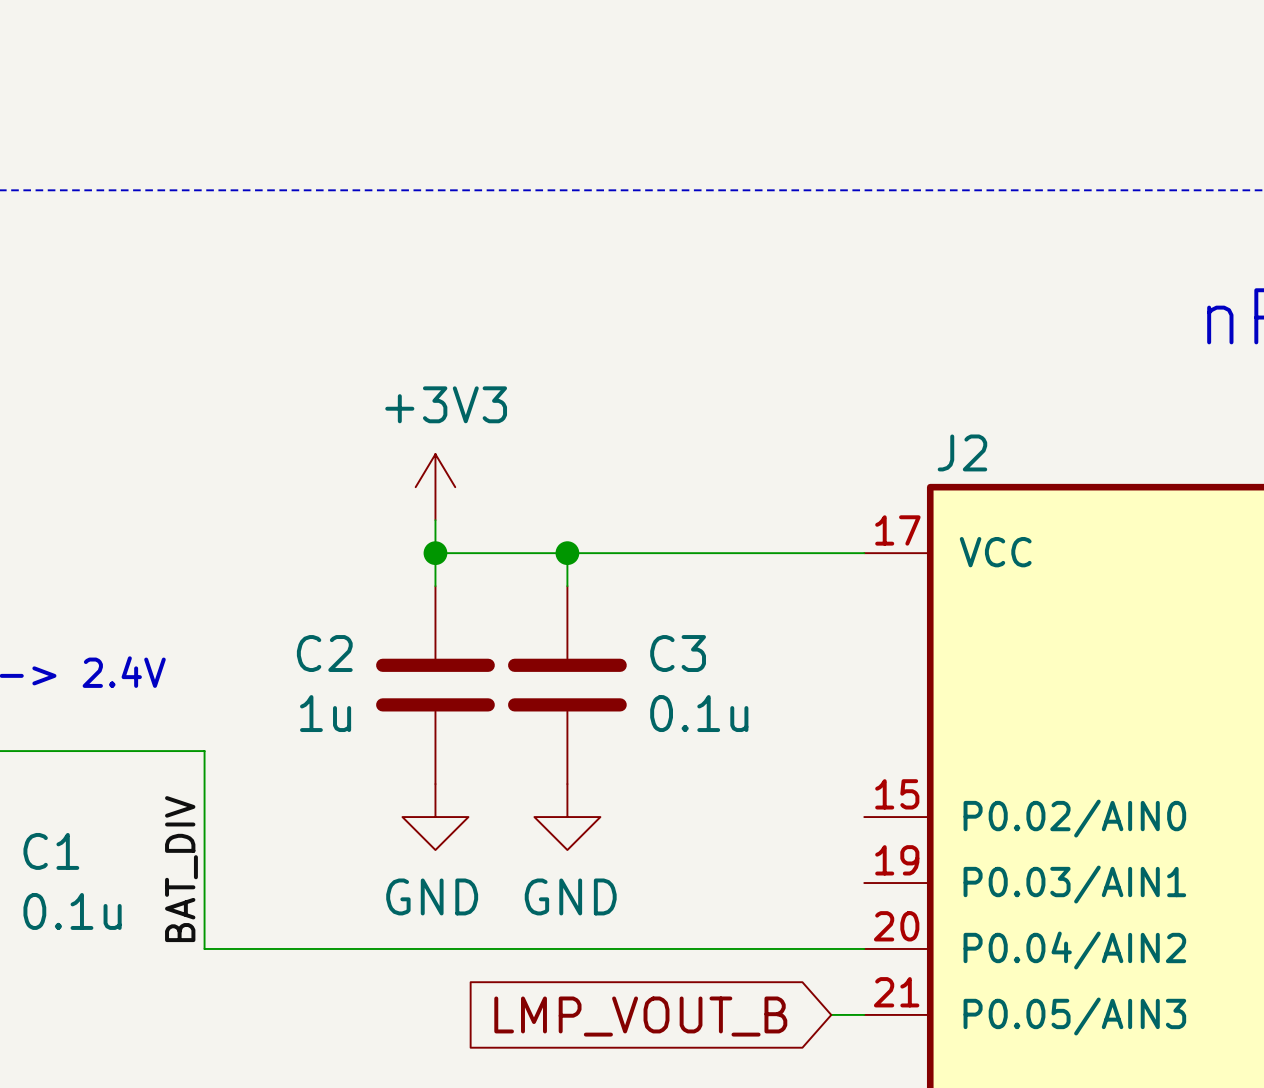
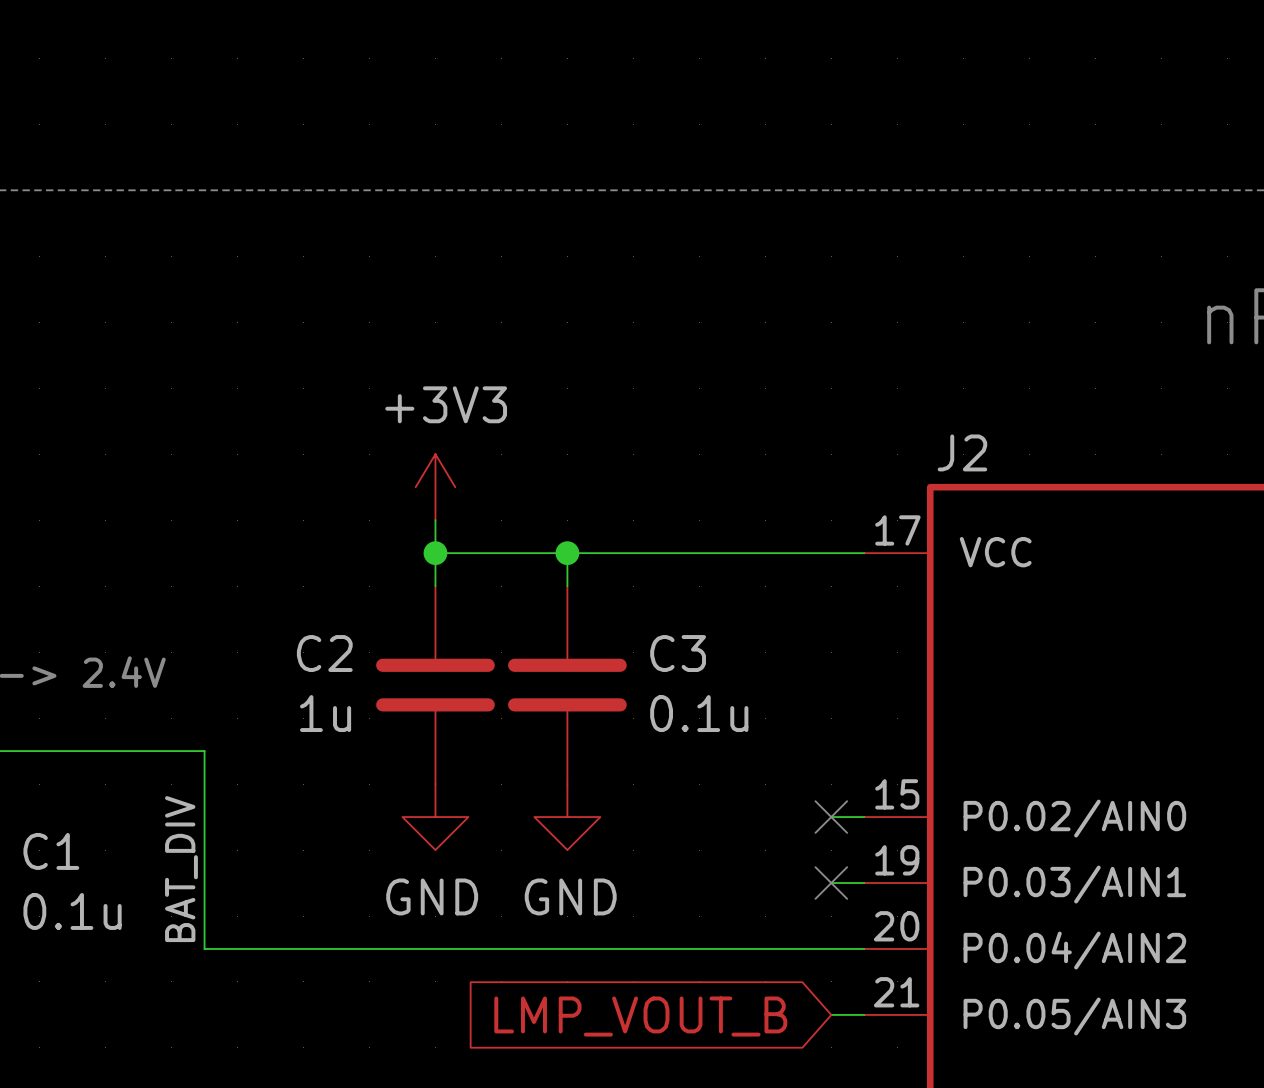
wire: none -> (831, 817) (864, 817)
no-connect mark: none -> (831, 817)
wire: none -> (831, 883) (864, 883)
no-connect mark: none -> (831, 883)

